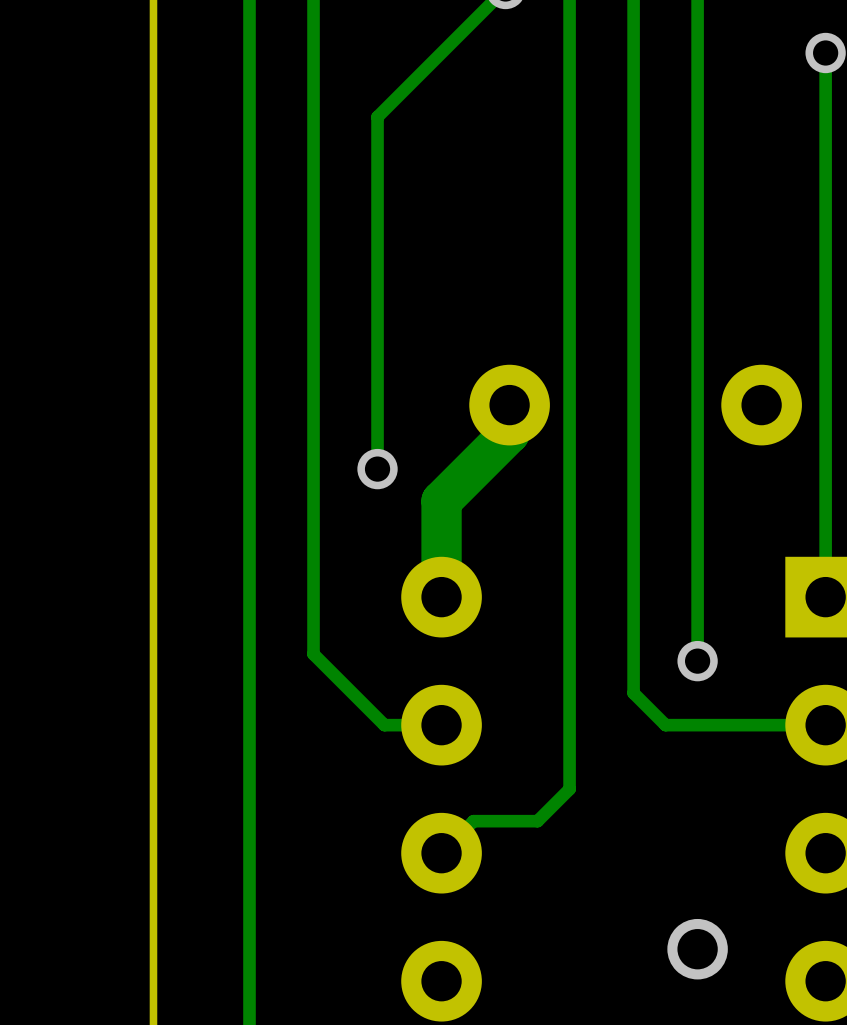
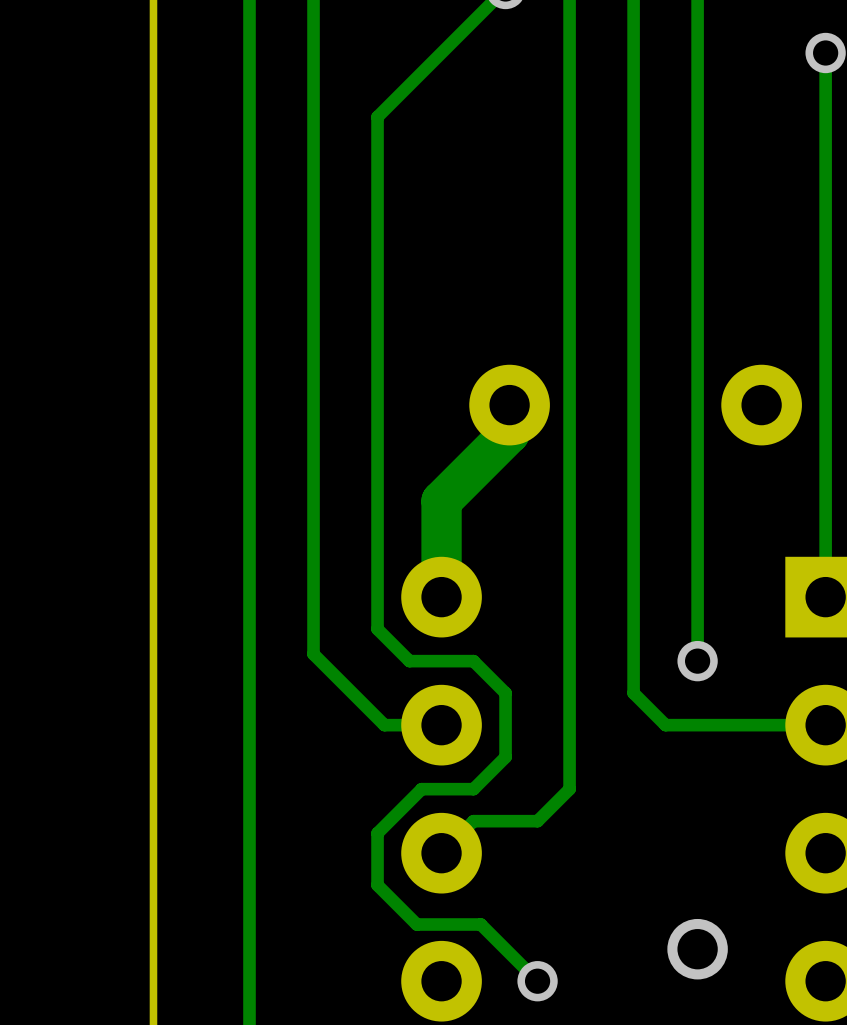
track: none -> (377, 469) (377, 629) (409, 661) (473, 661) (505, 693) (505, 757) (473, 789) (421, 789) (377, 833) (377, 885) (416, 924) (480, 924) (537, 981)
via: (377, 469) -> none
via: none -> (537, 981)

